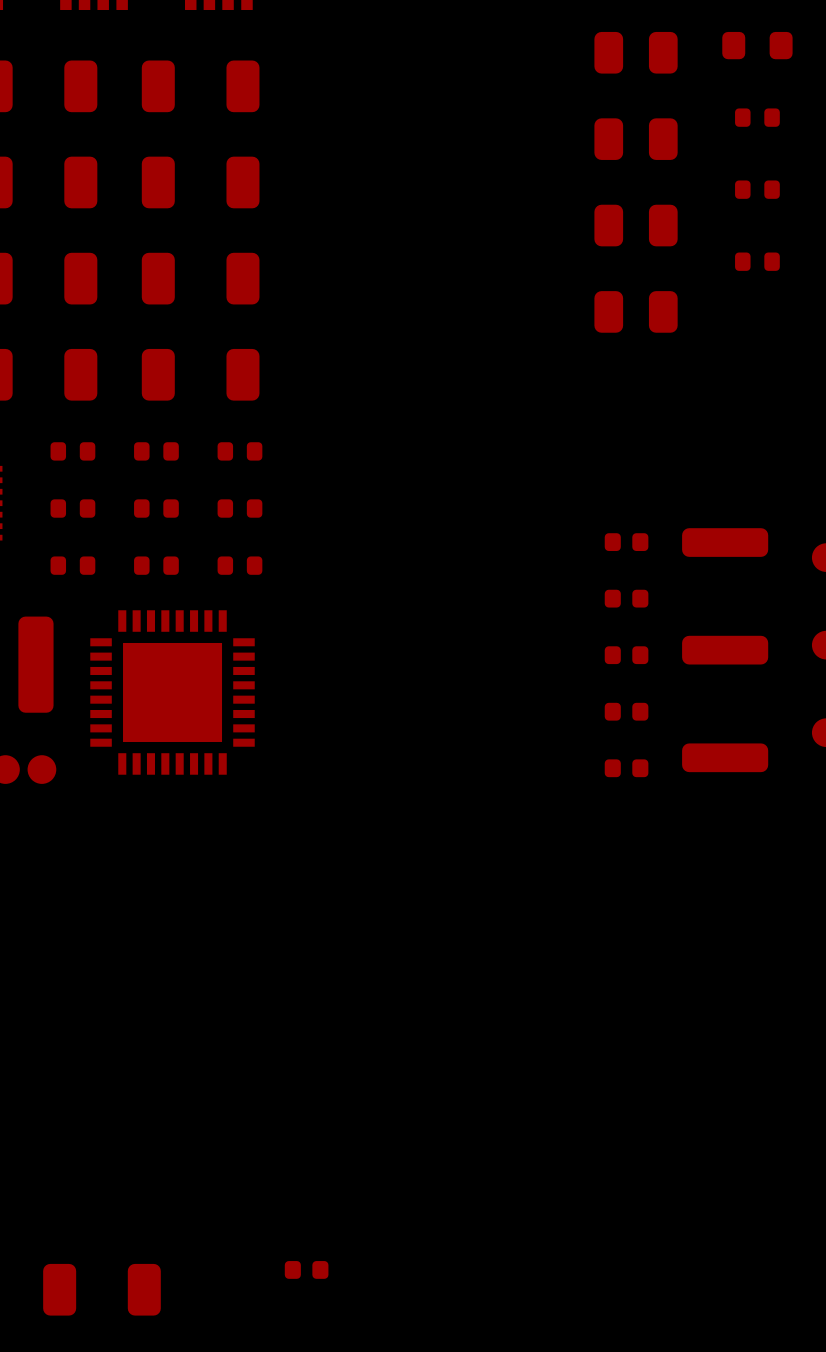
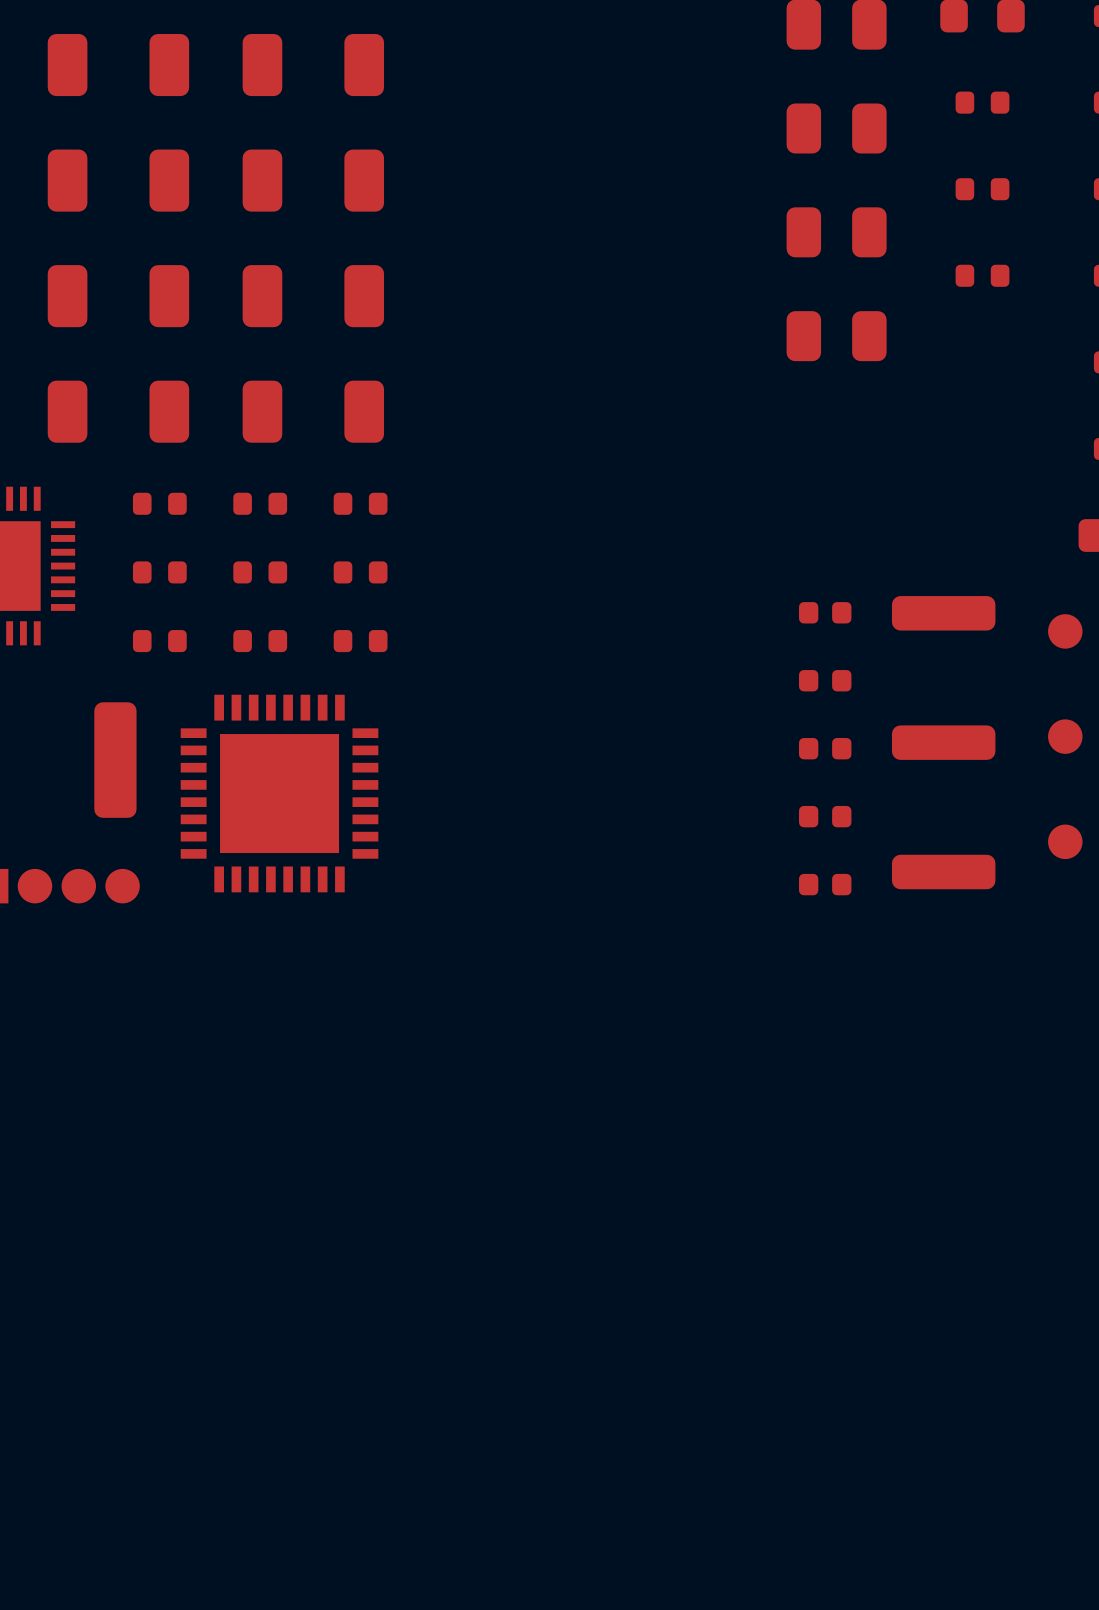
part: (306, 1269) -> none
part: (101, 1289) -> none

